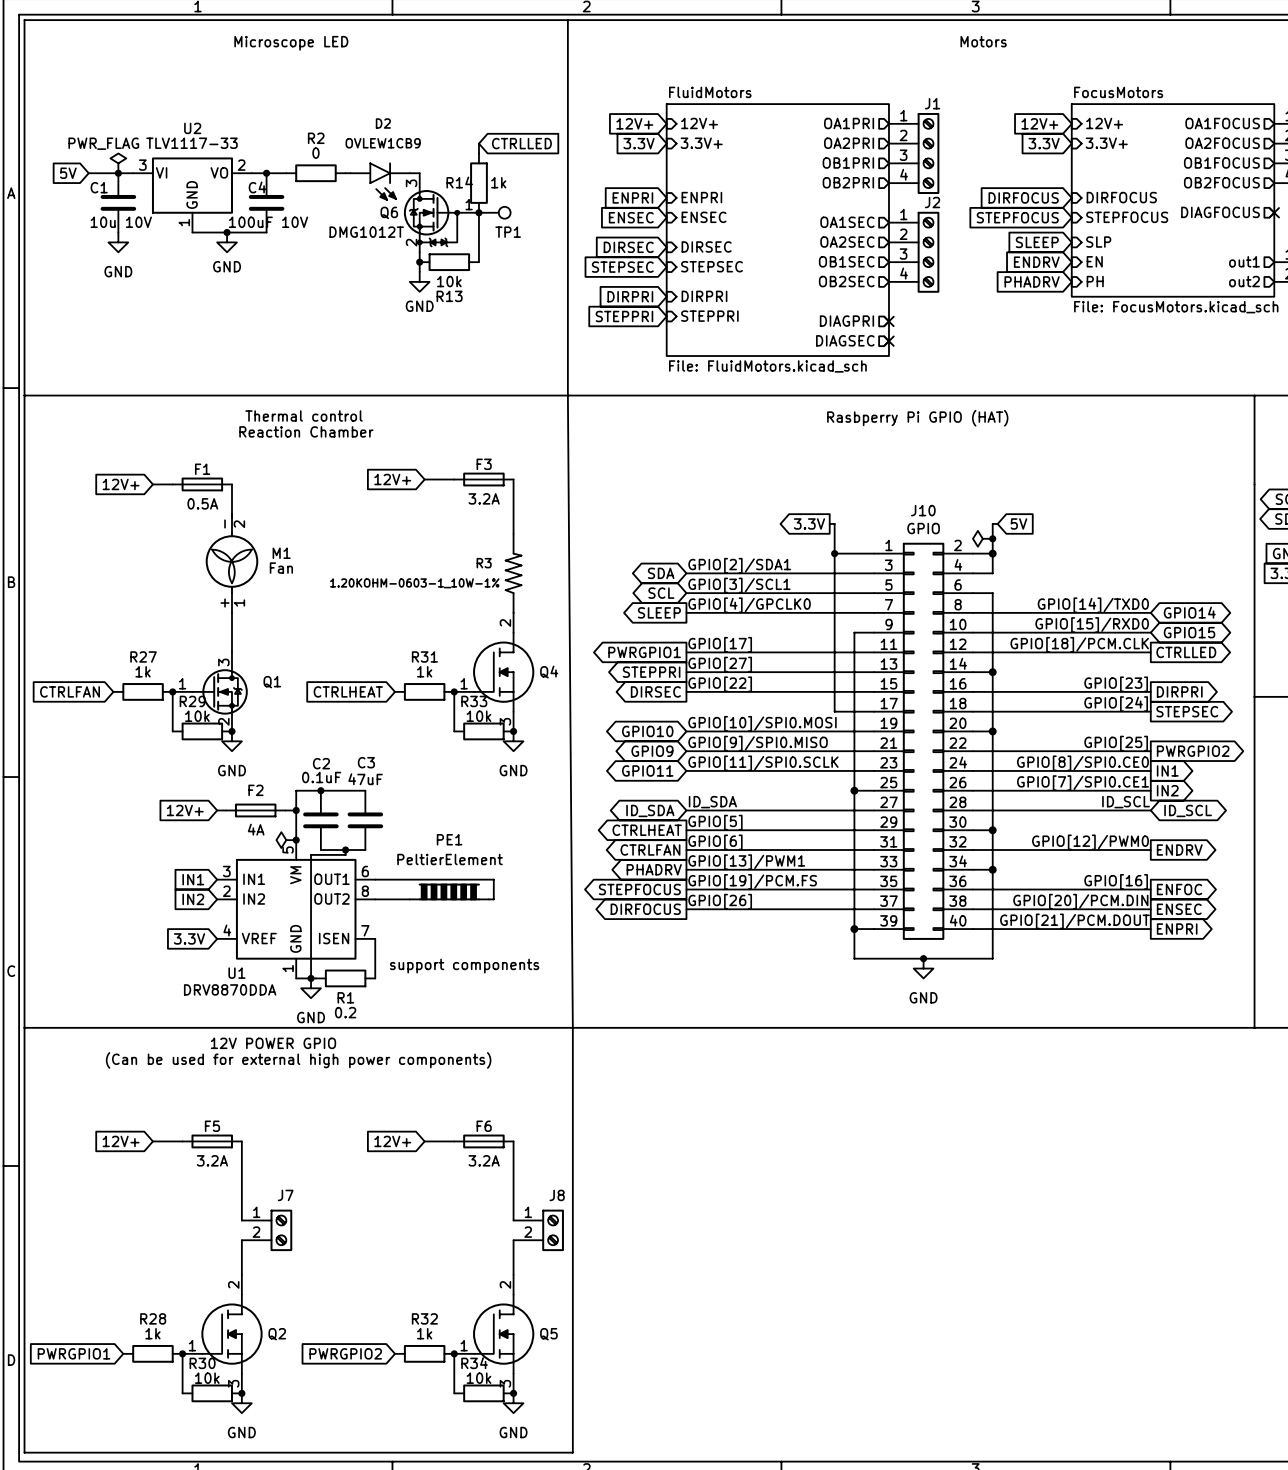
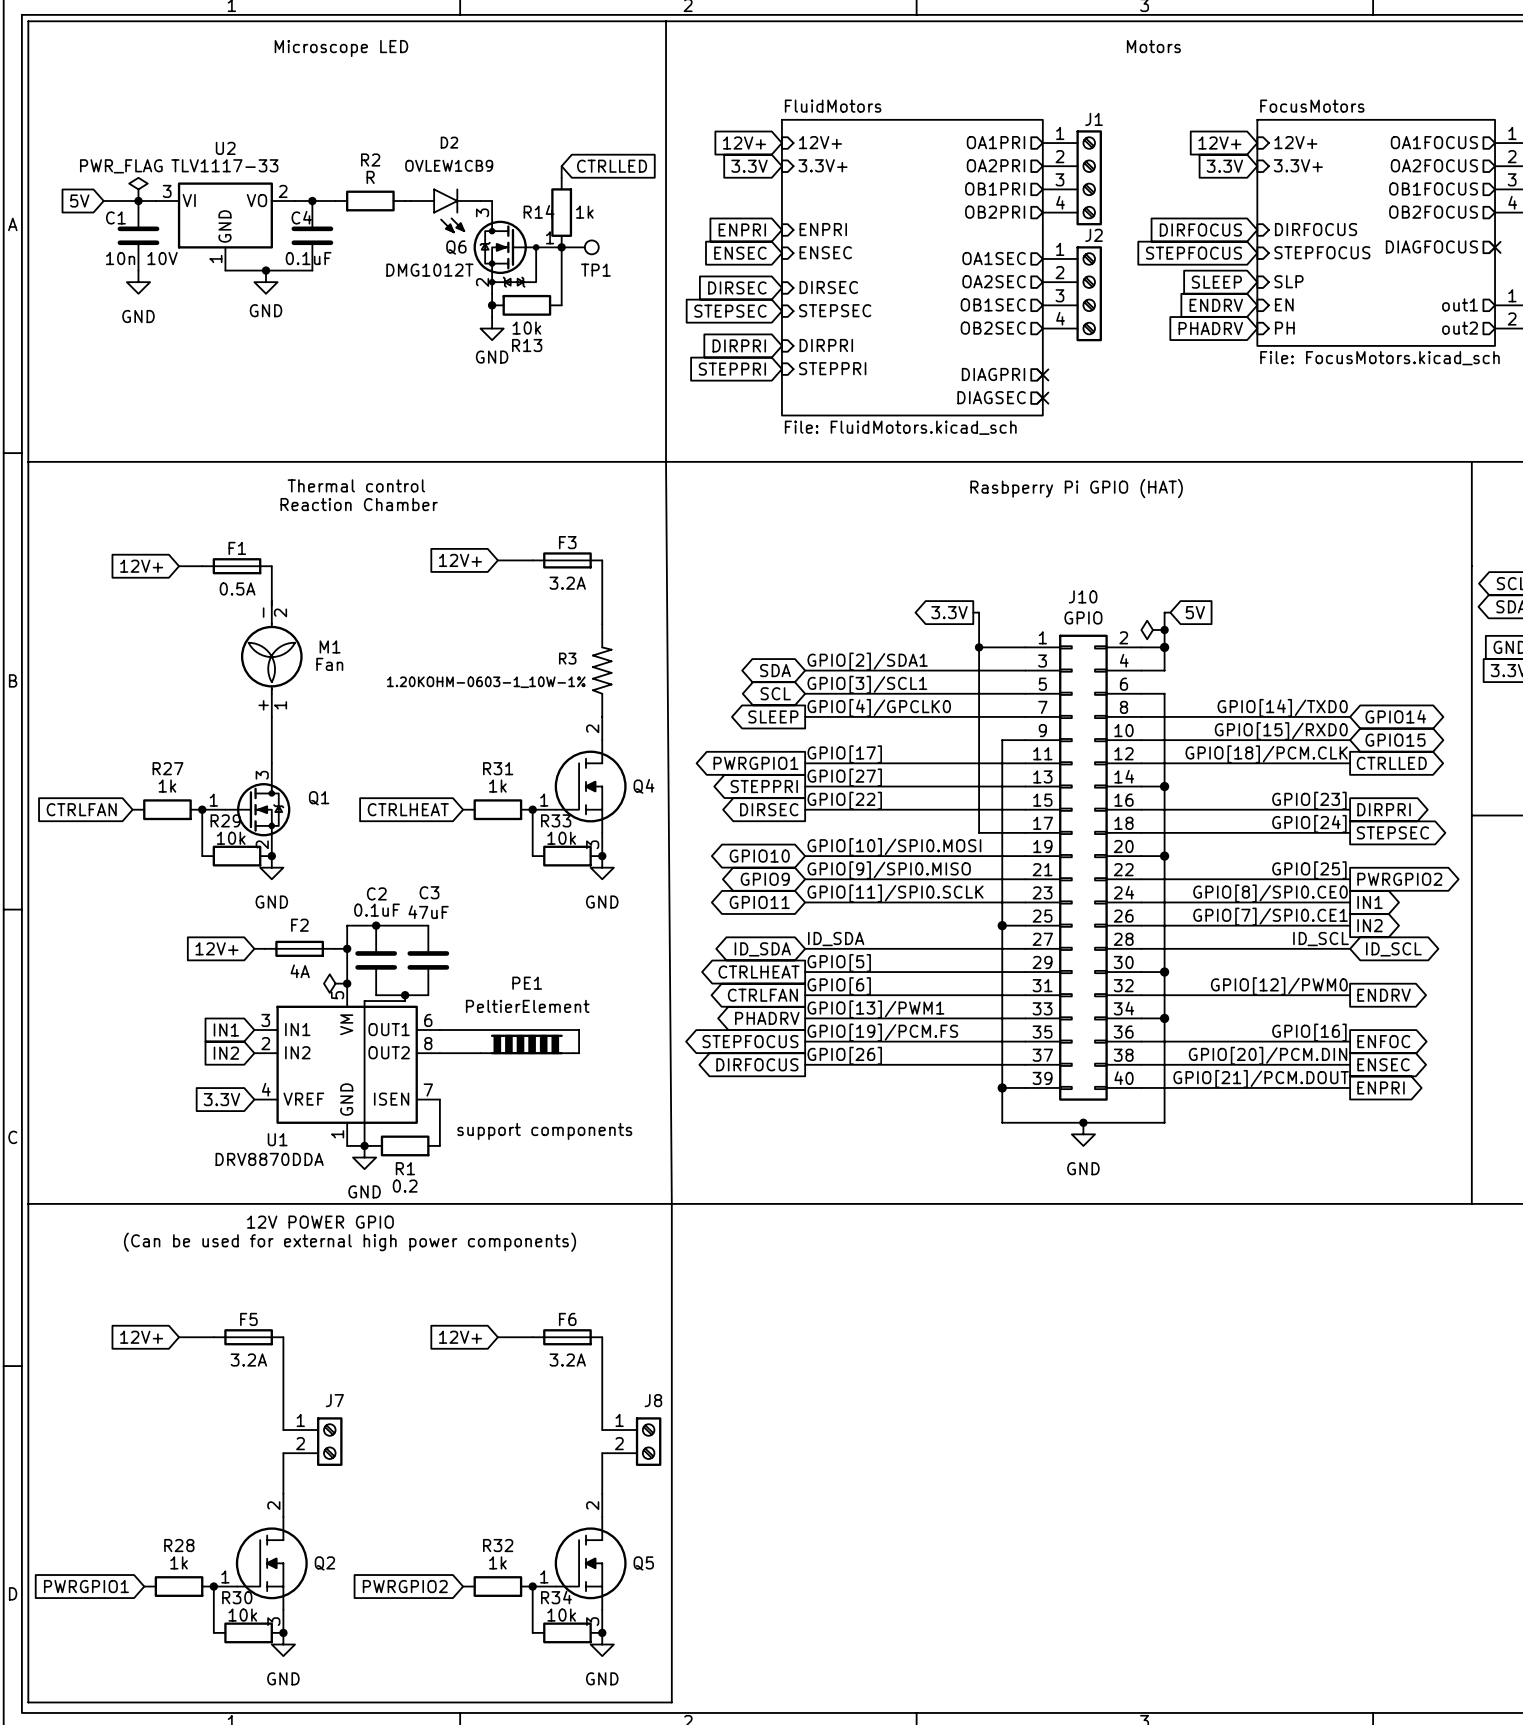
R2 value: 0 (315, 153) -> R (370, 177)
C1 value: 10u 10V (121, 222) -> 10n 10V (141, 258)
C4 value: 100uF 10V (268, 222) -> 0.1uF (308, 258)

